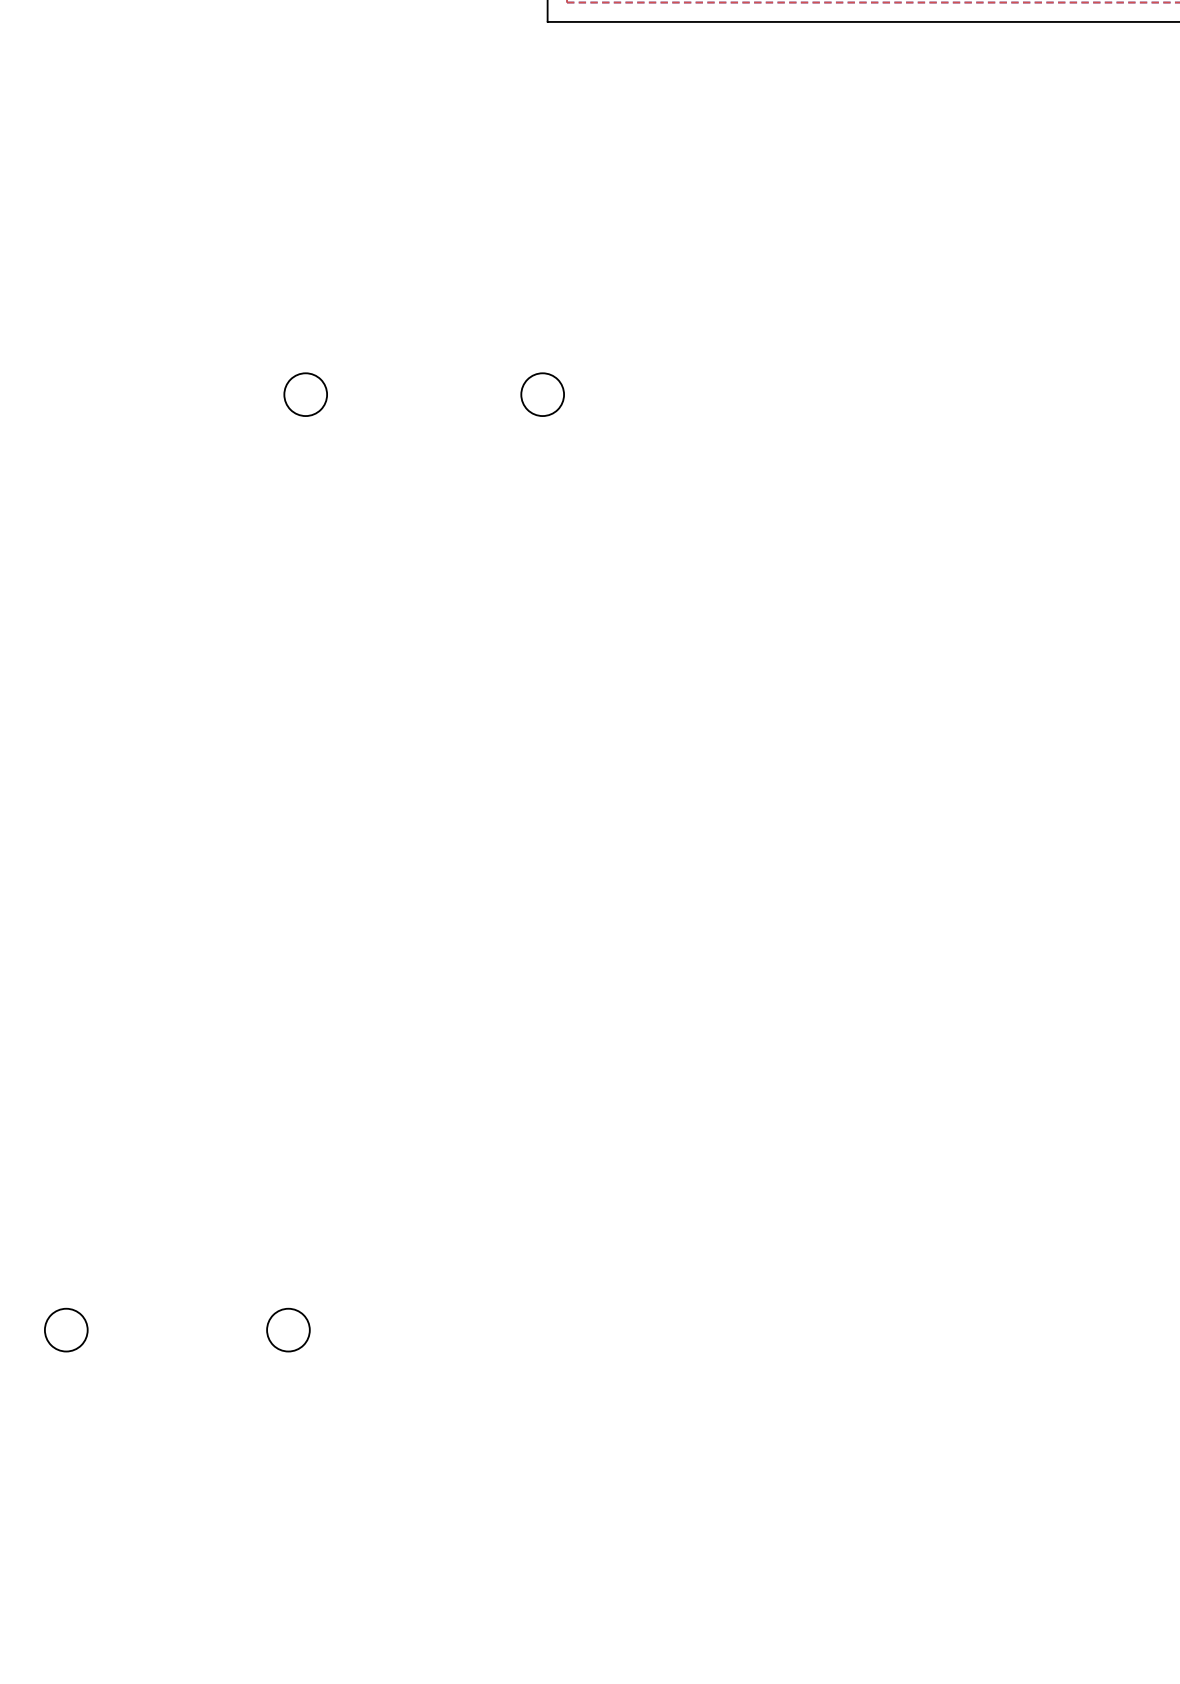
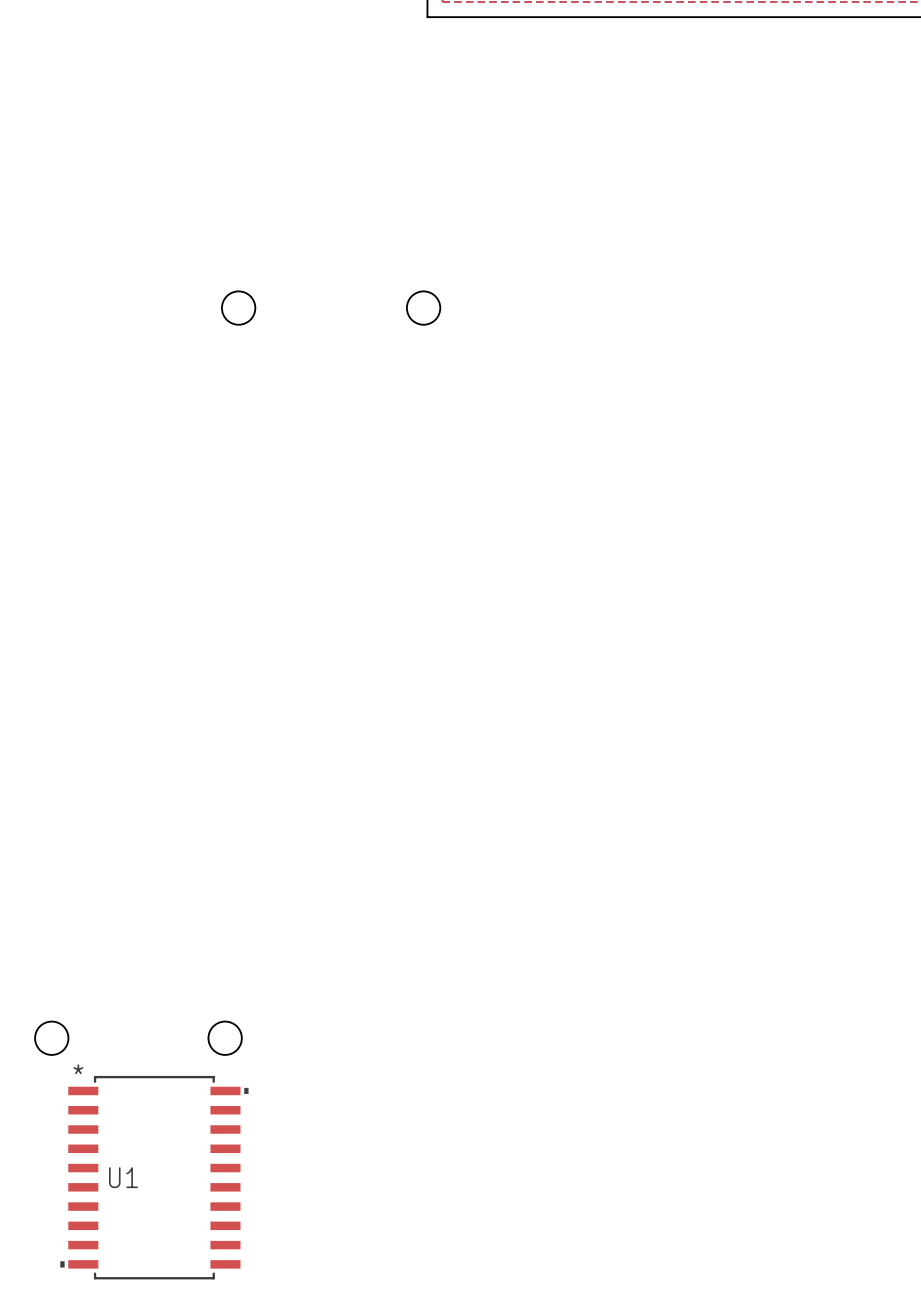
U1: none -> (154, 1177)

